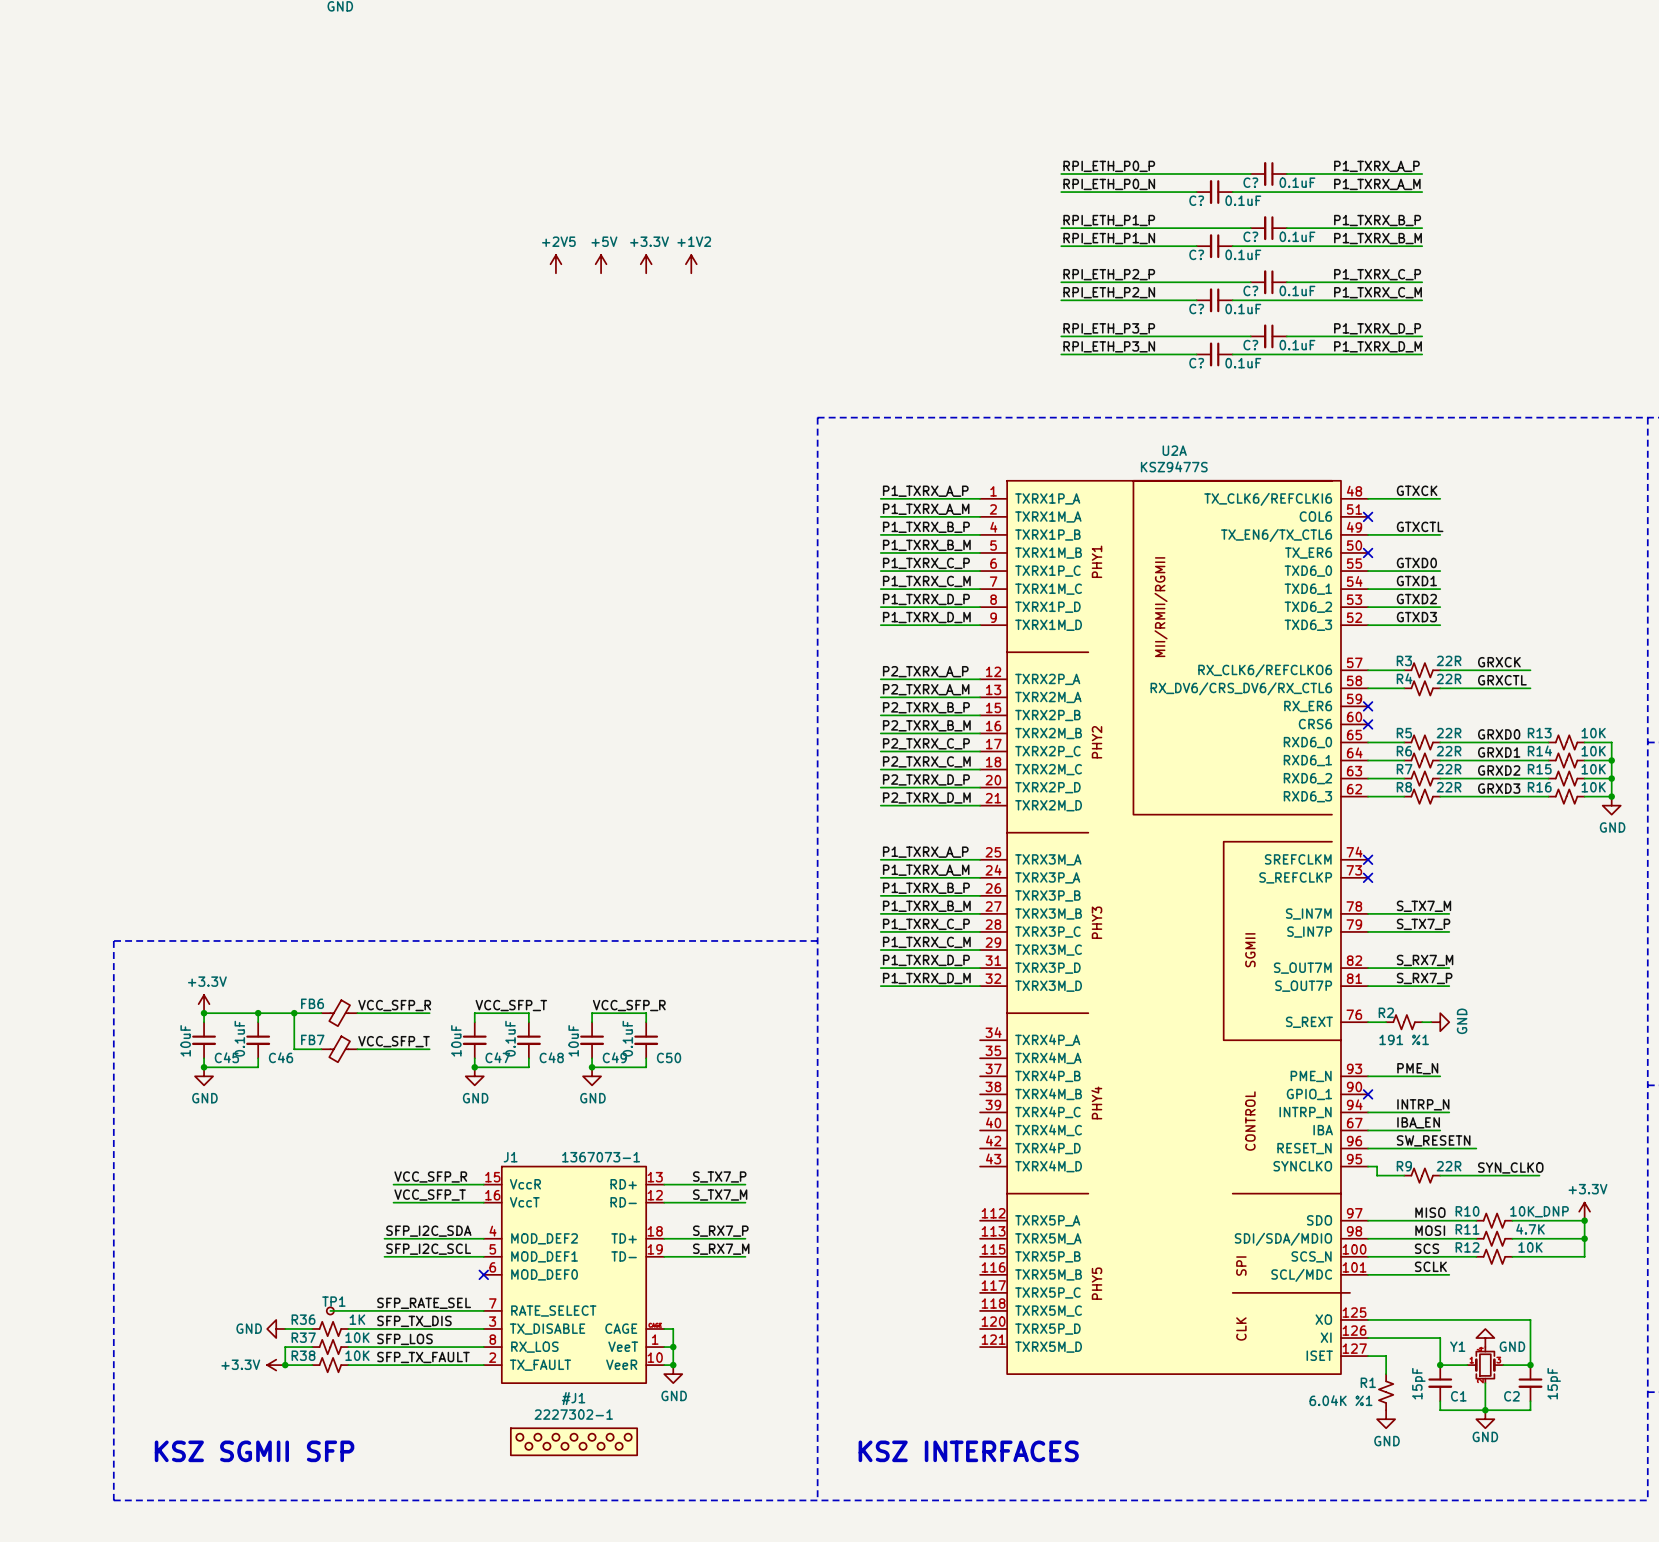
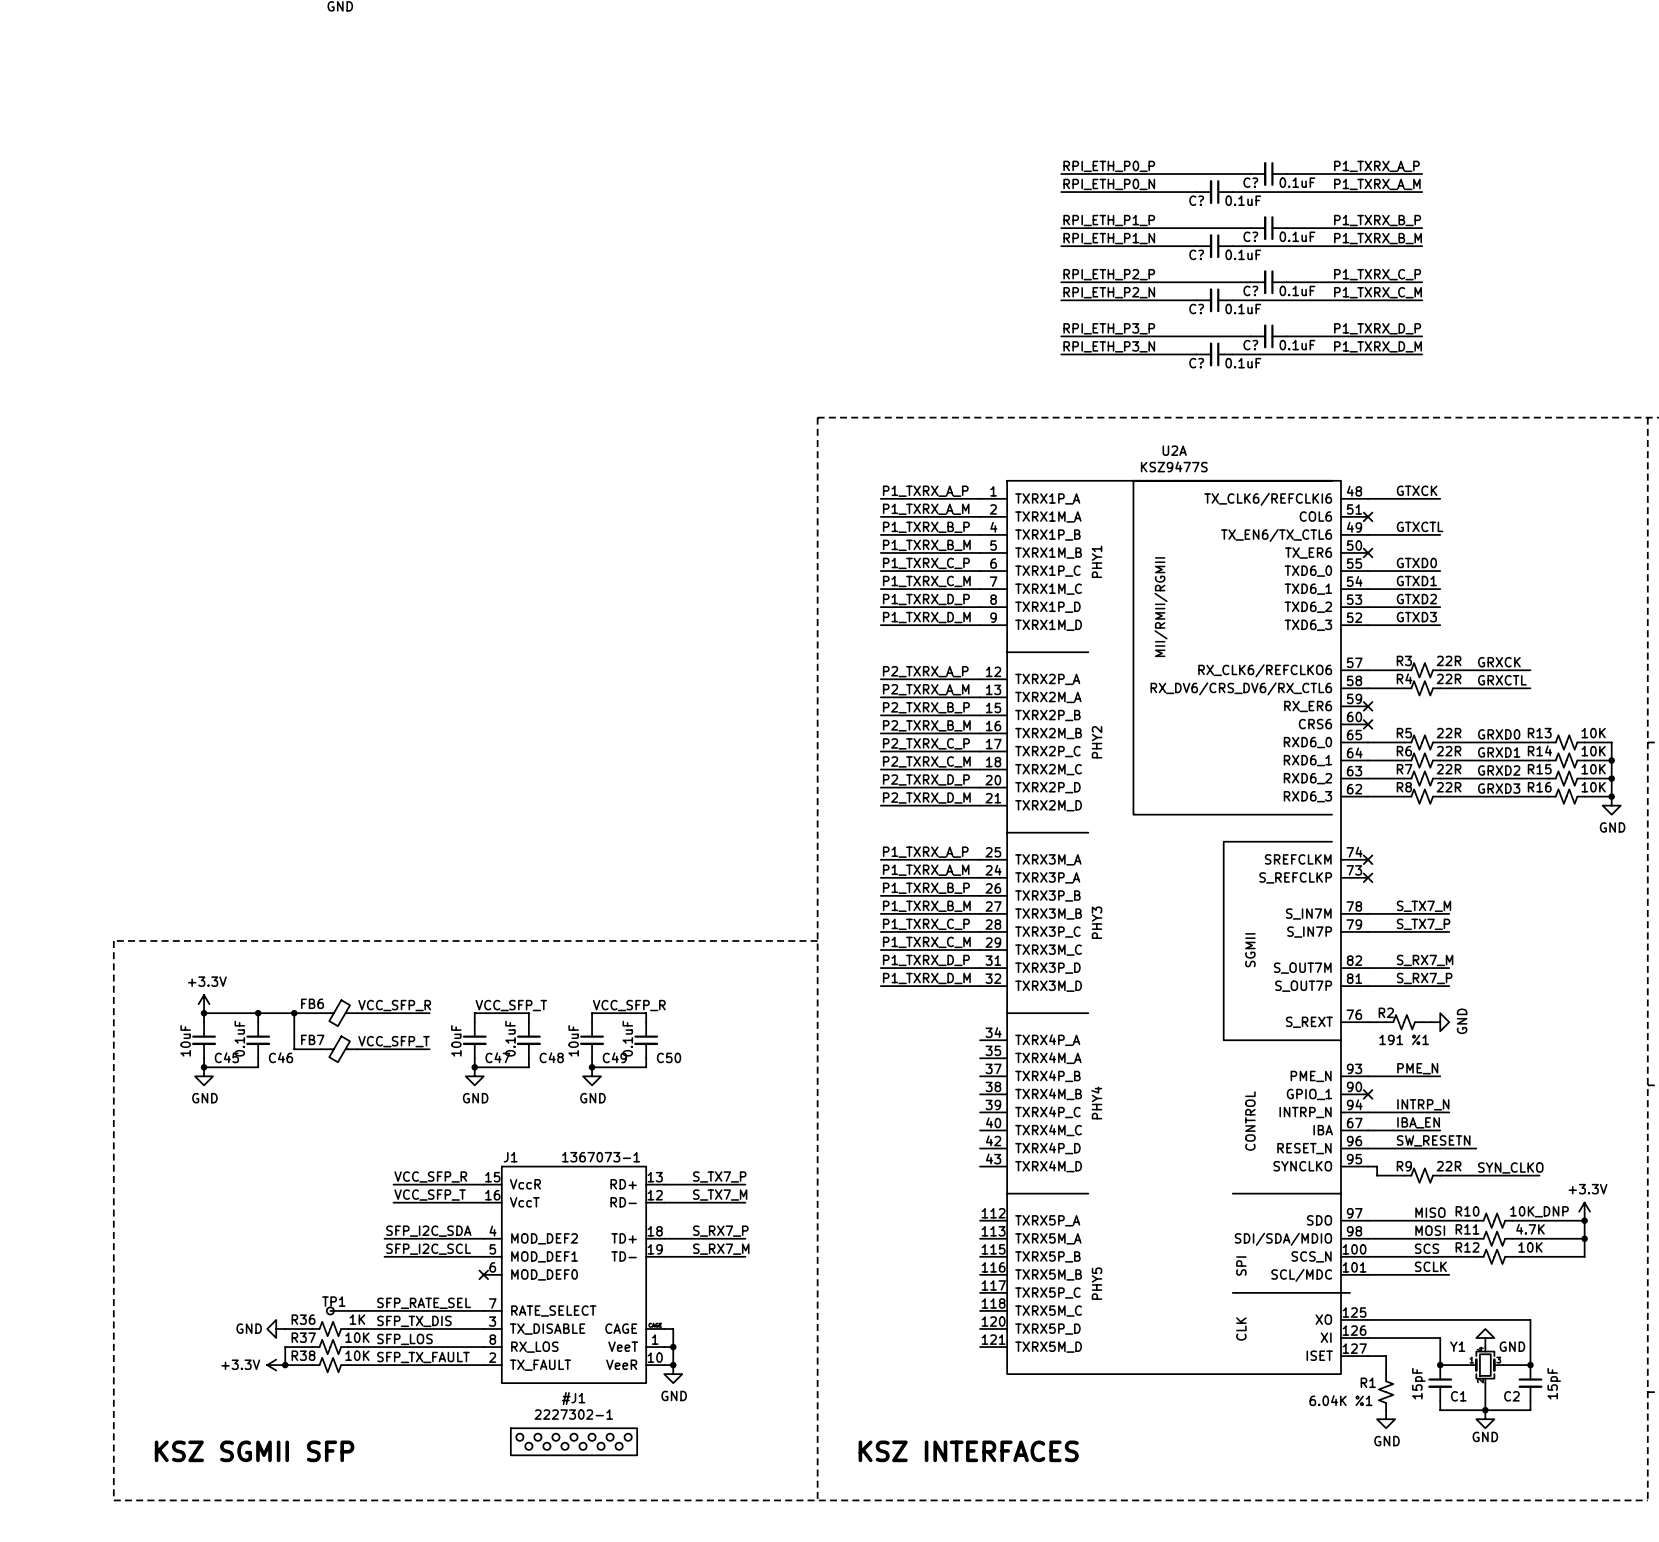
power symbol: +2V5 (555, 264) -> none
power symbol: +5V (601, 264) -> none
power symbol: +3.3V (646, 264) -> none
power symbol: +1V2 (691, 264) -> none

